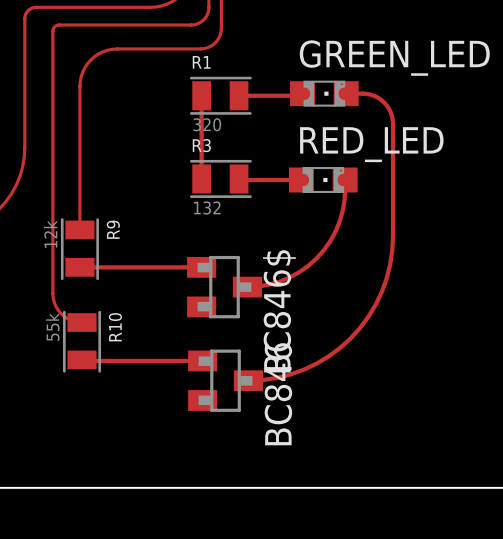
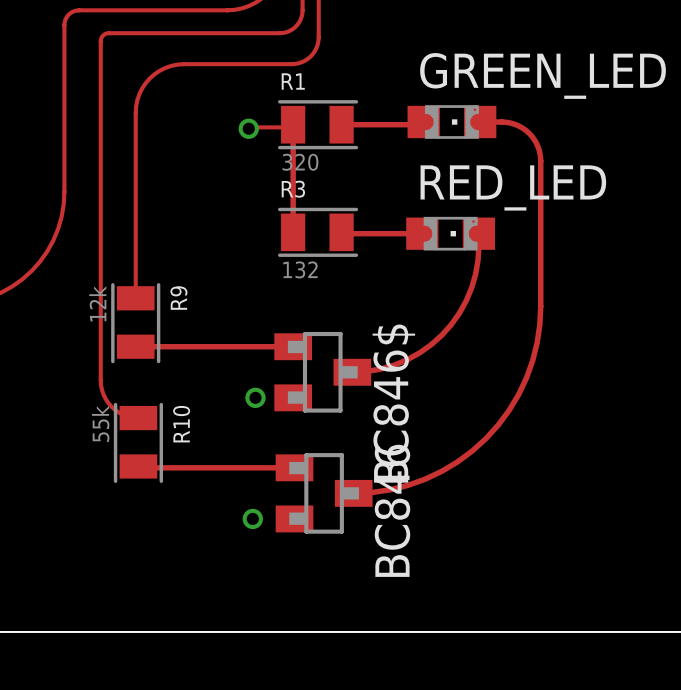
track: none -> (293, 127) (248, 128)
via: none -> (248, 128)
via: none -> (255, 397)
via: none -> (252, 518)

